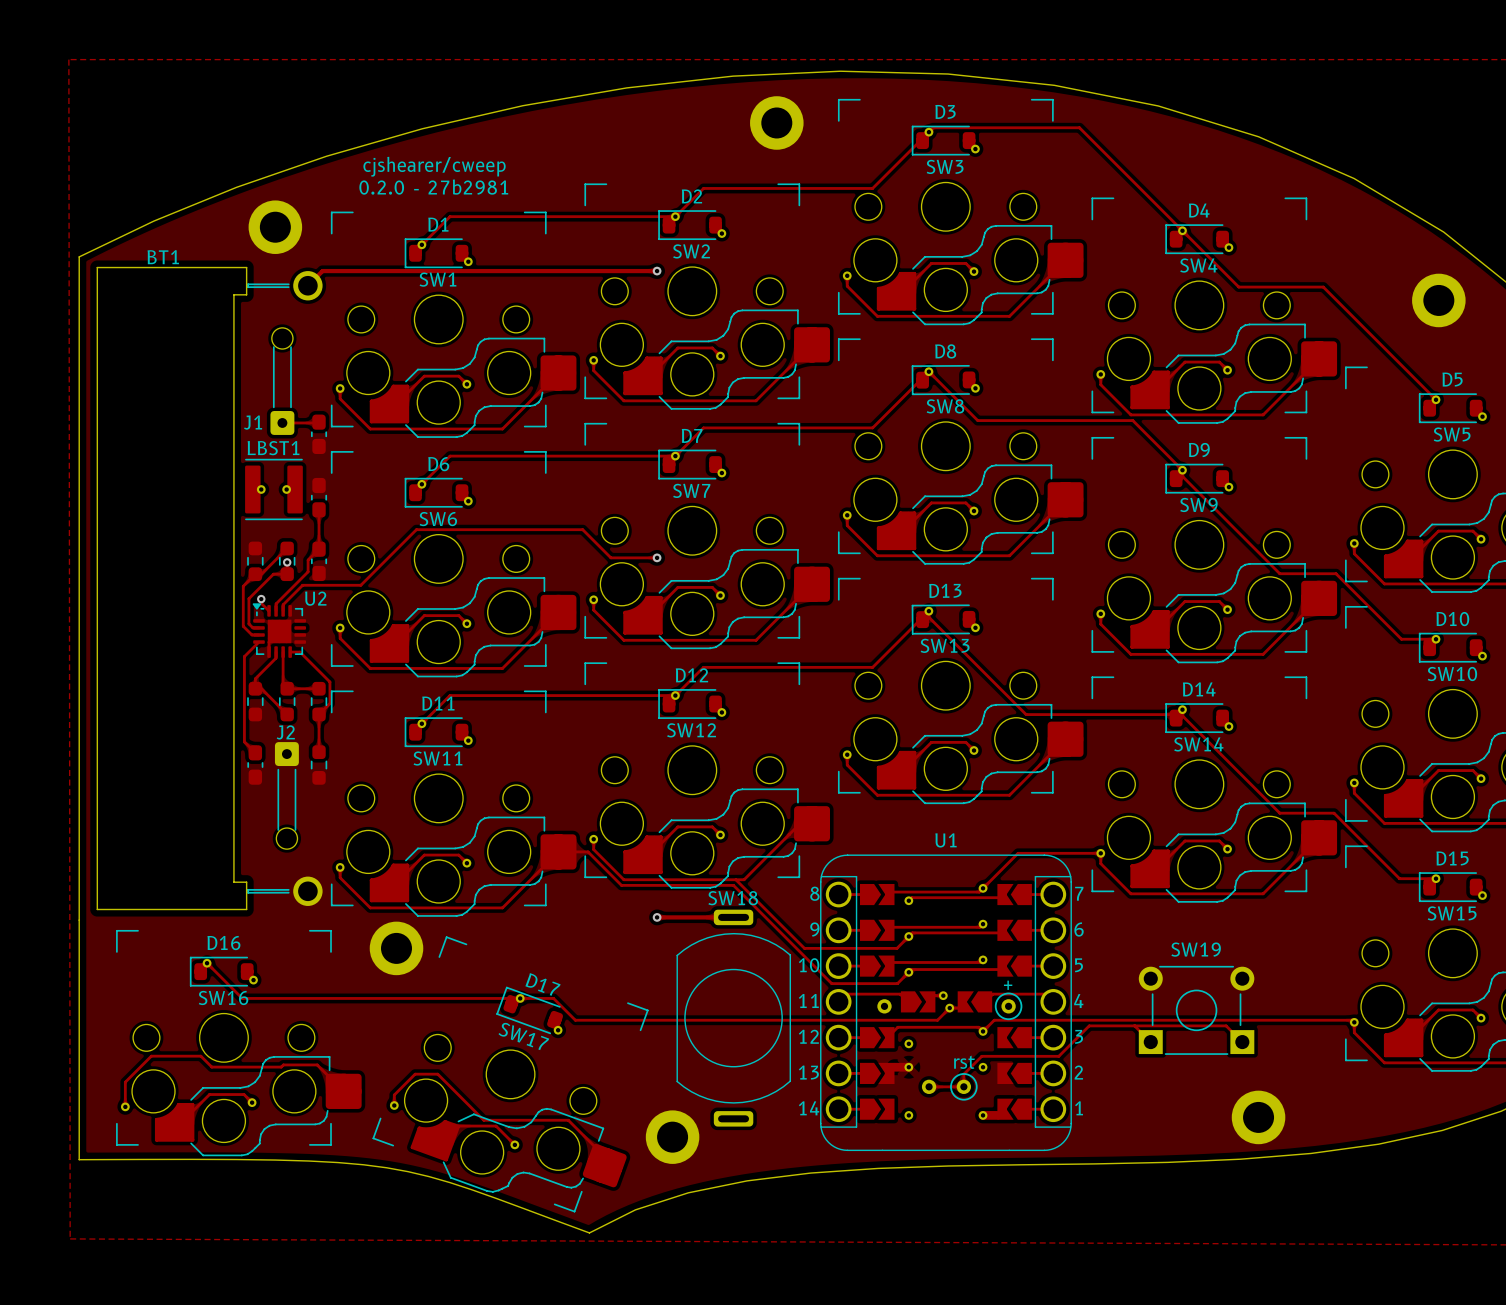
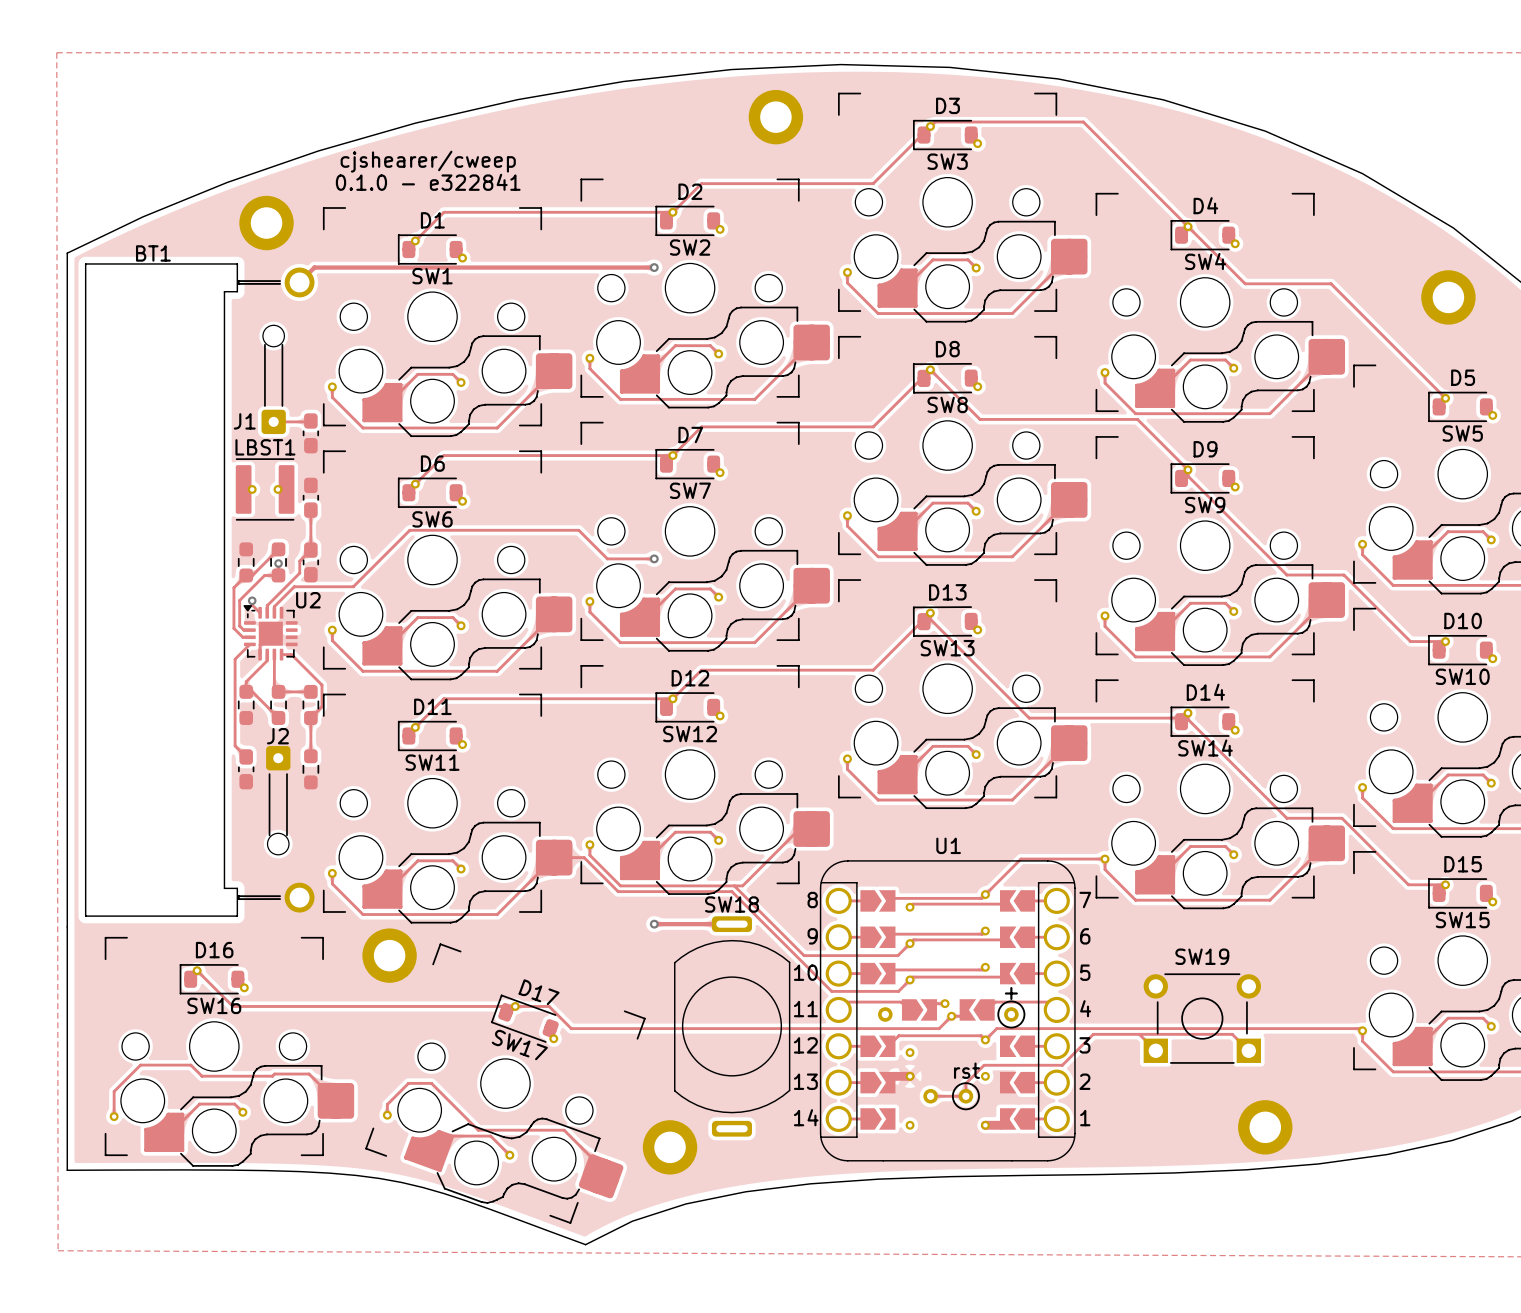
text: 0.2.0 - 27b2981 (433, 187) -> 0.1.0 - e322841 (428, 182)

